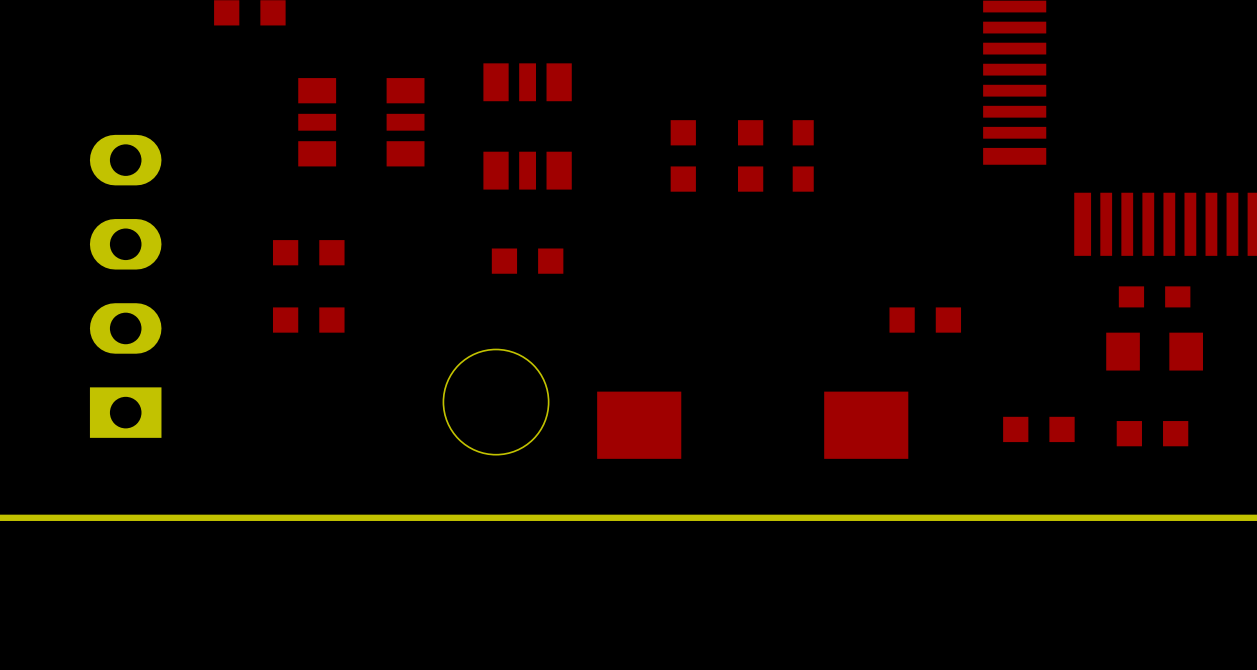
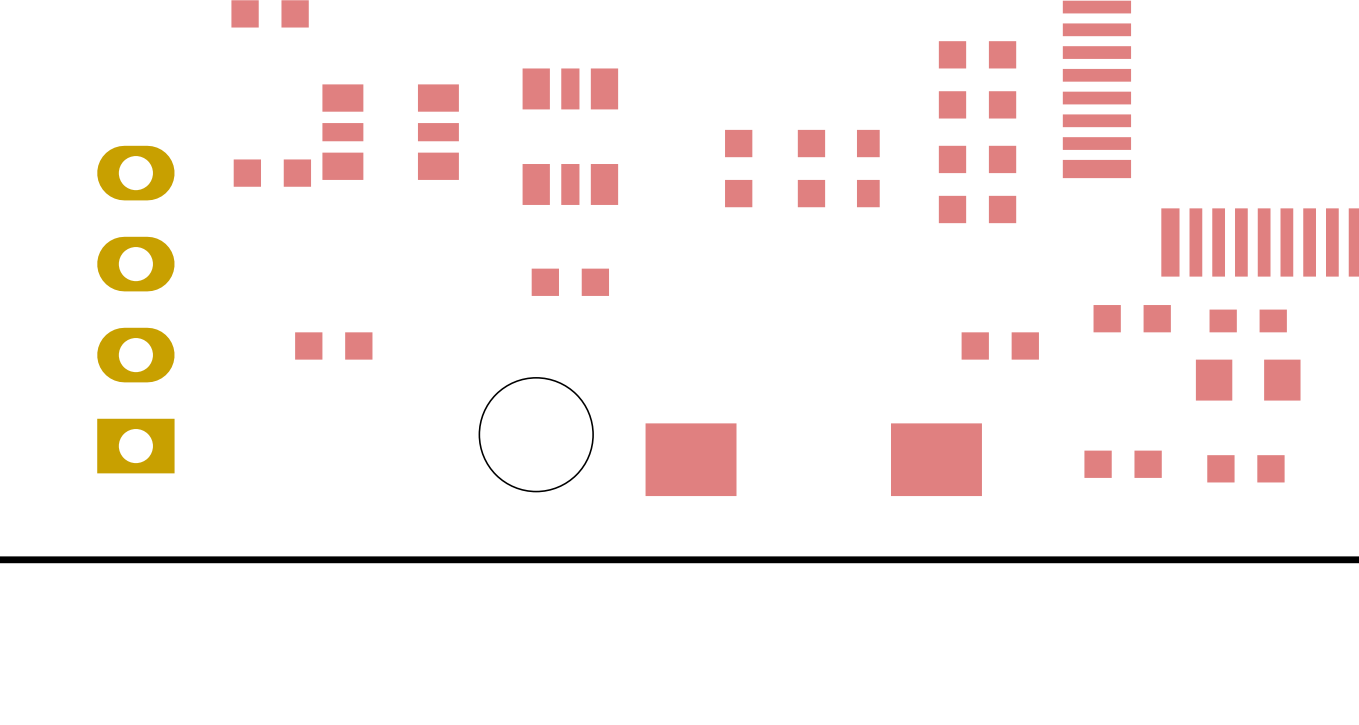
part: none -> (977, 54)
part: none -> (977, 104)
part: none -> (977, 159)
part: none -> (272, 173)
part: none -> (977, 209)
part: (308, 252) -> none
part: none -> (1132, 318)

